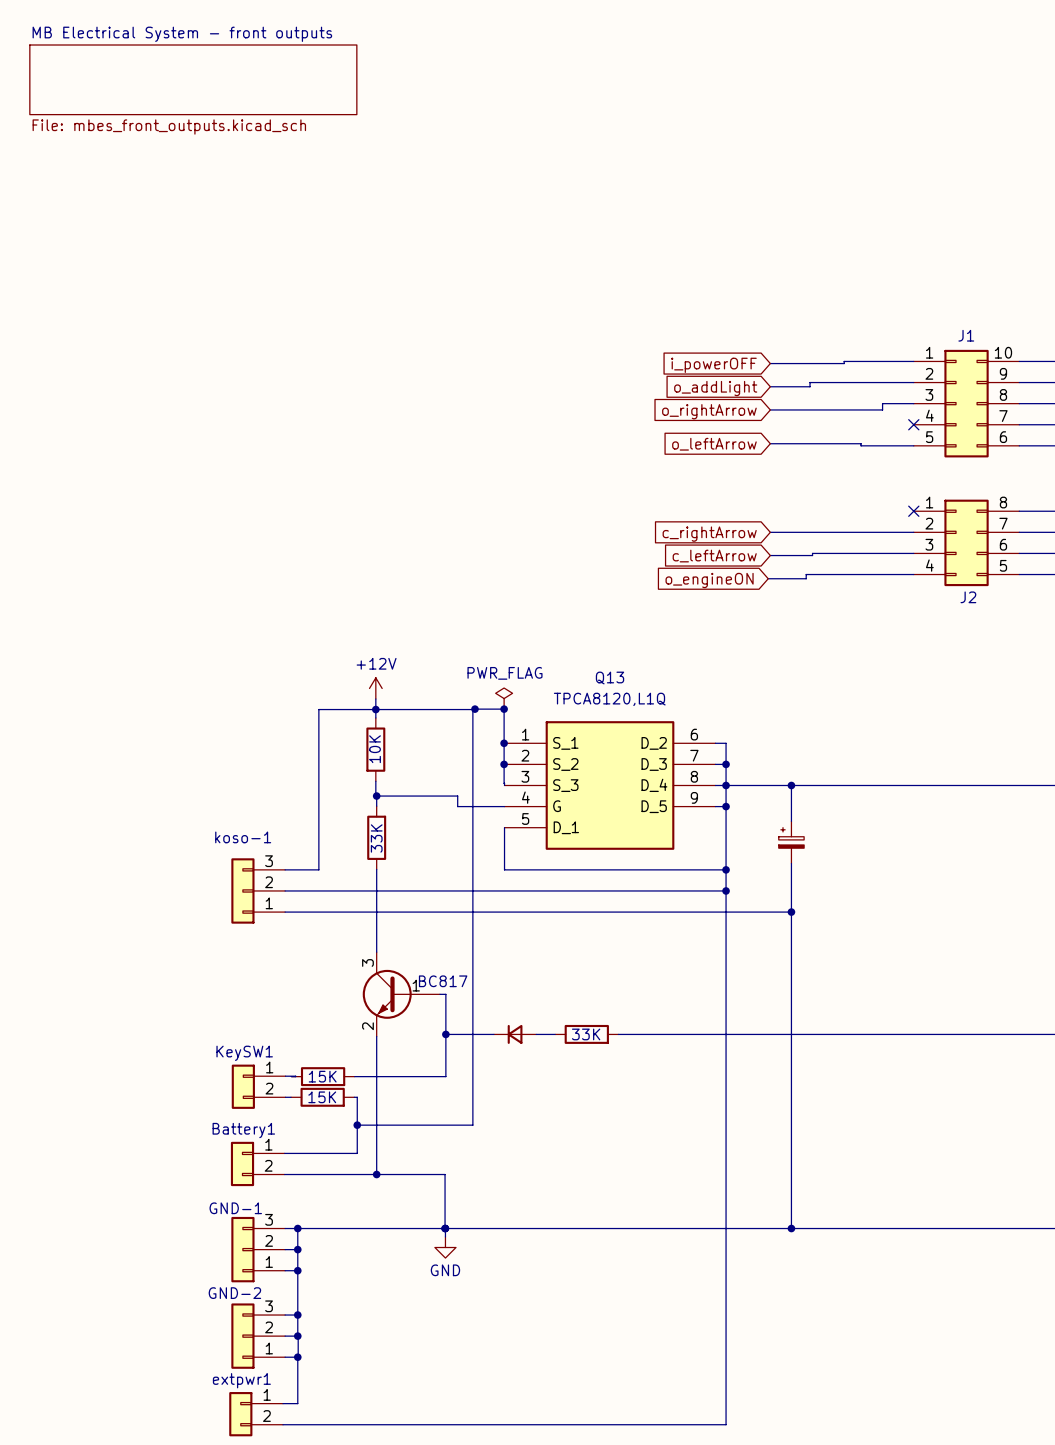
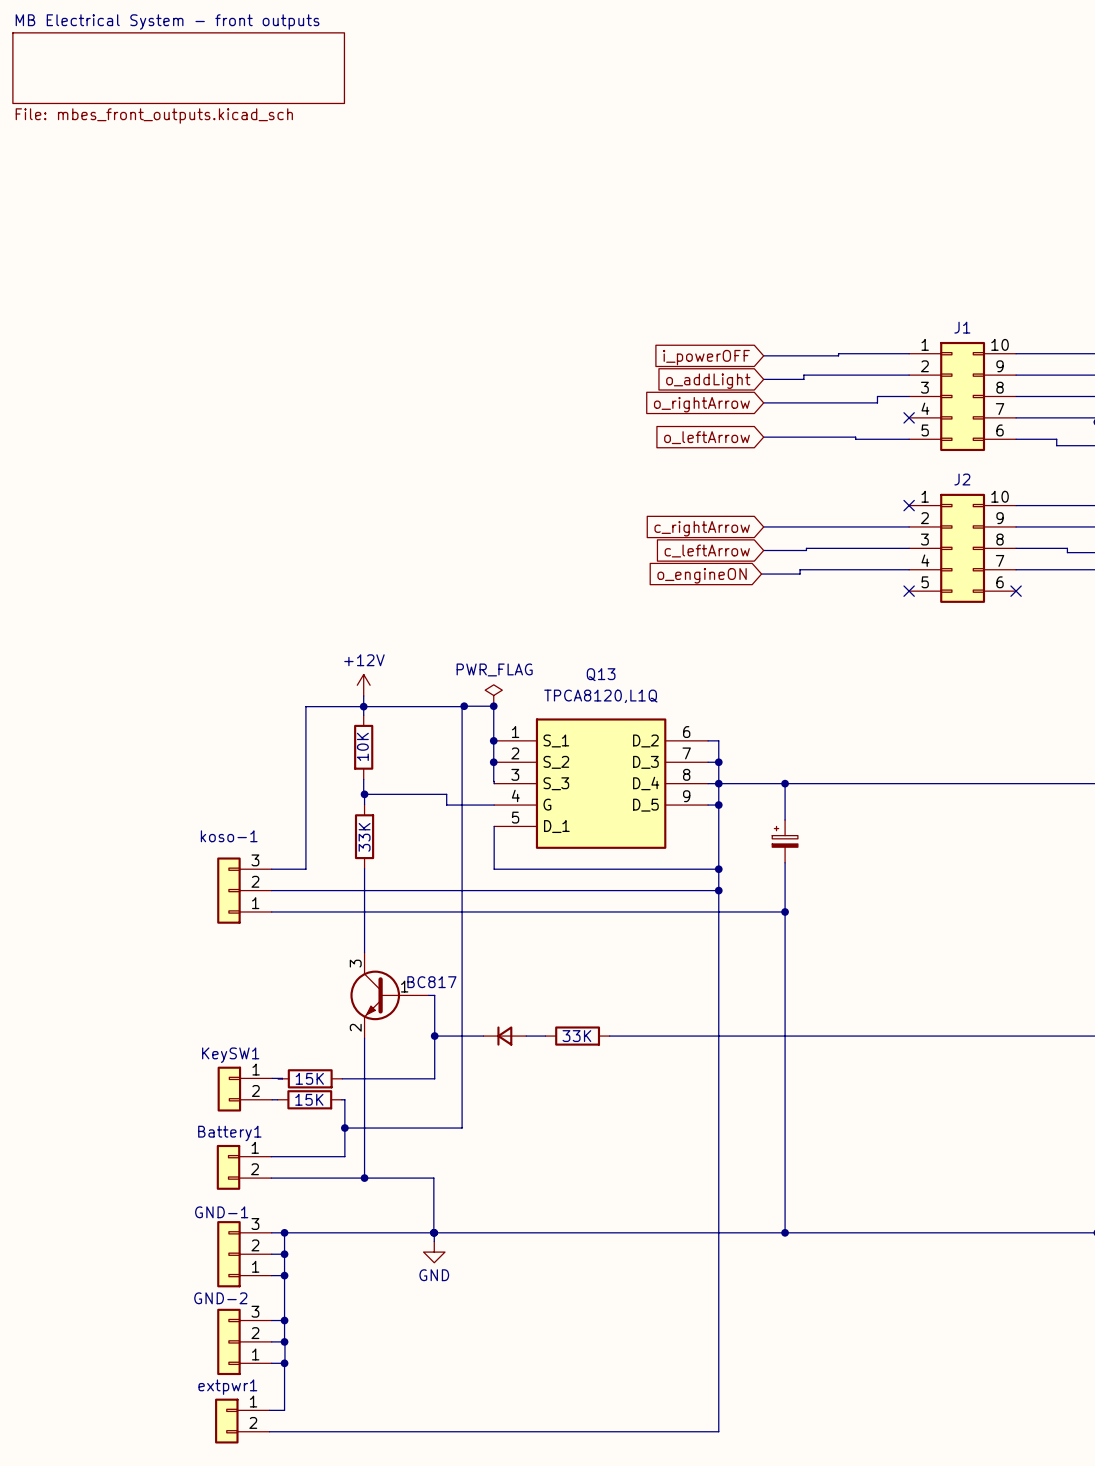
J2 symbol: [913, 499, 1020, 587] -> [909, 493, 1017, 603]
no-connect mark: none -> (909, 591)
no-connect mark: none -> (1016, 591)
J2 name position: J2 (968, 597) -> J2 (962, 479)

